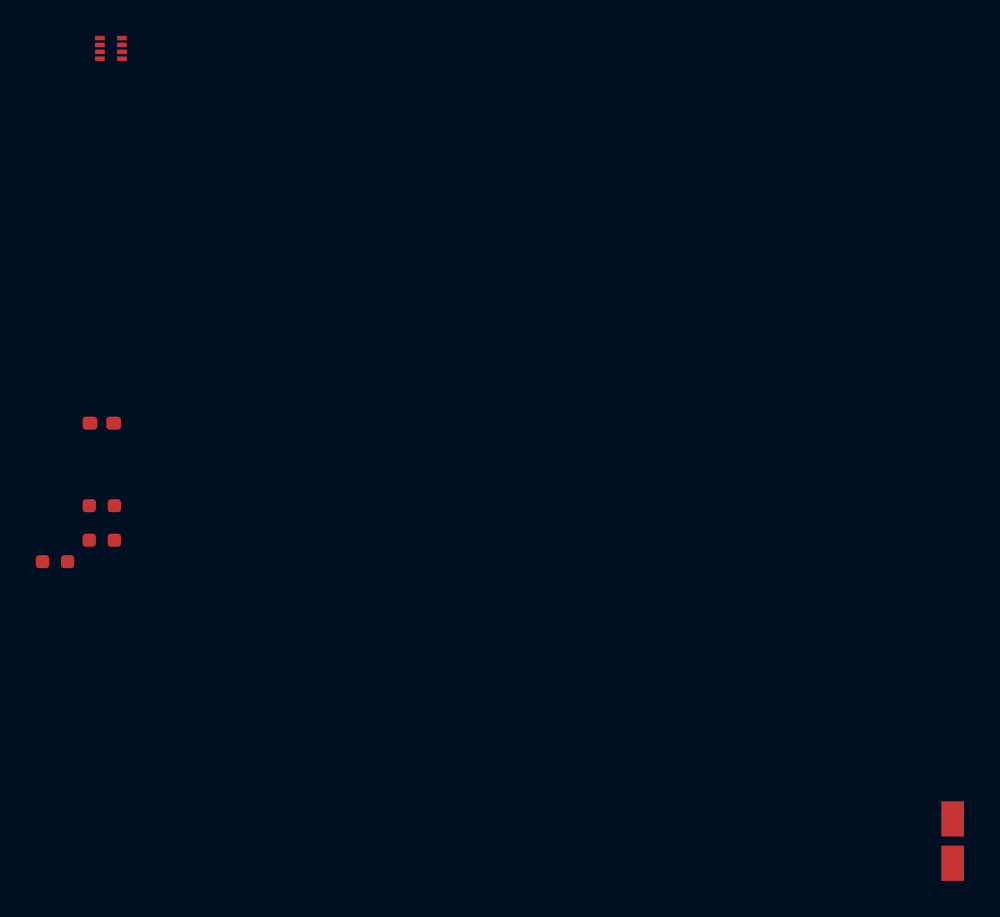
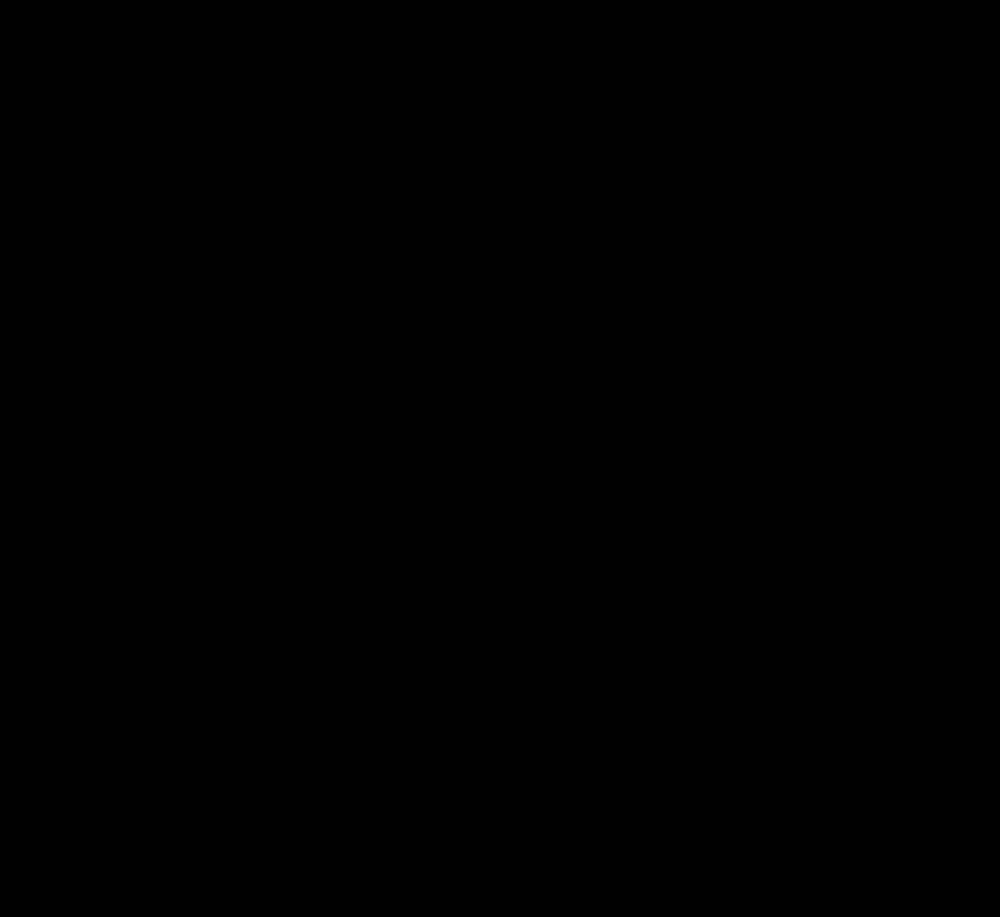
part: (110, 48) -> none
part: (101, 423) -> none
part: (101, 505) -> none
part: (101, 540) -> none
part: (55, 561) -> none
part: (952, 841) -> none

